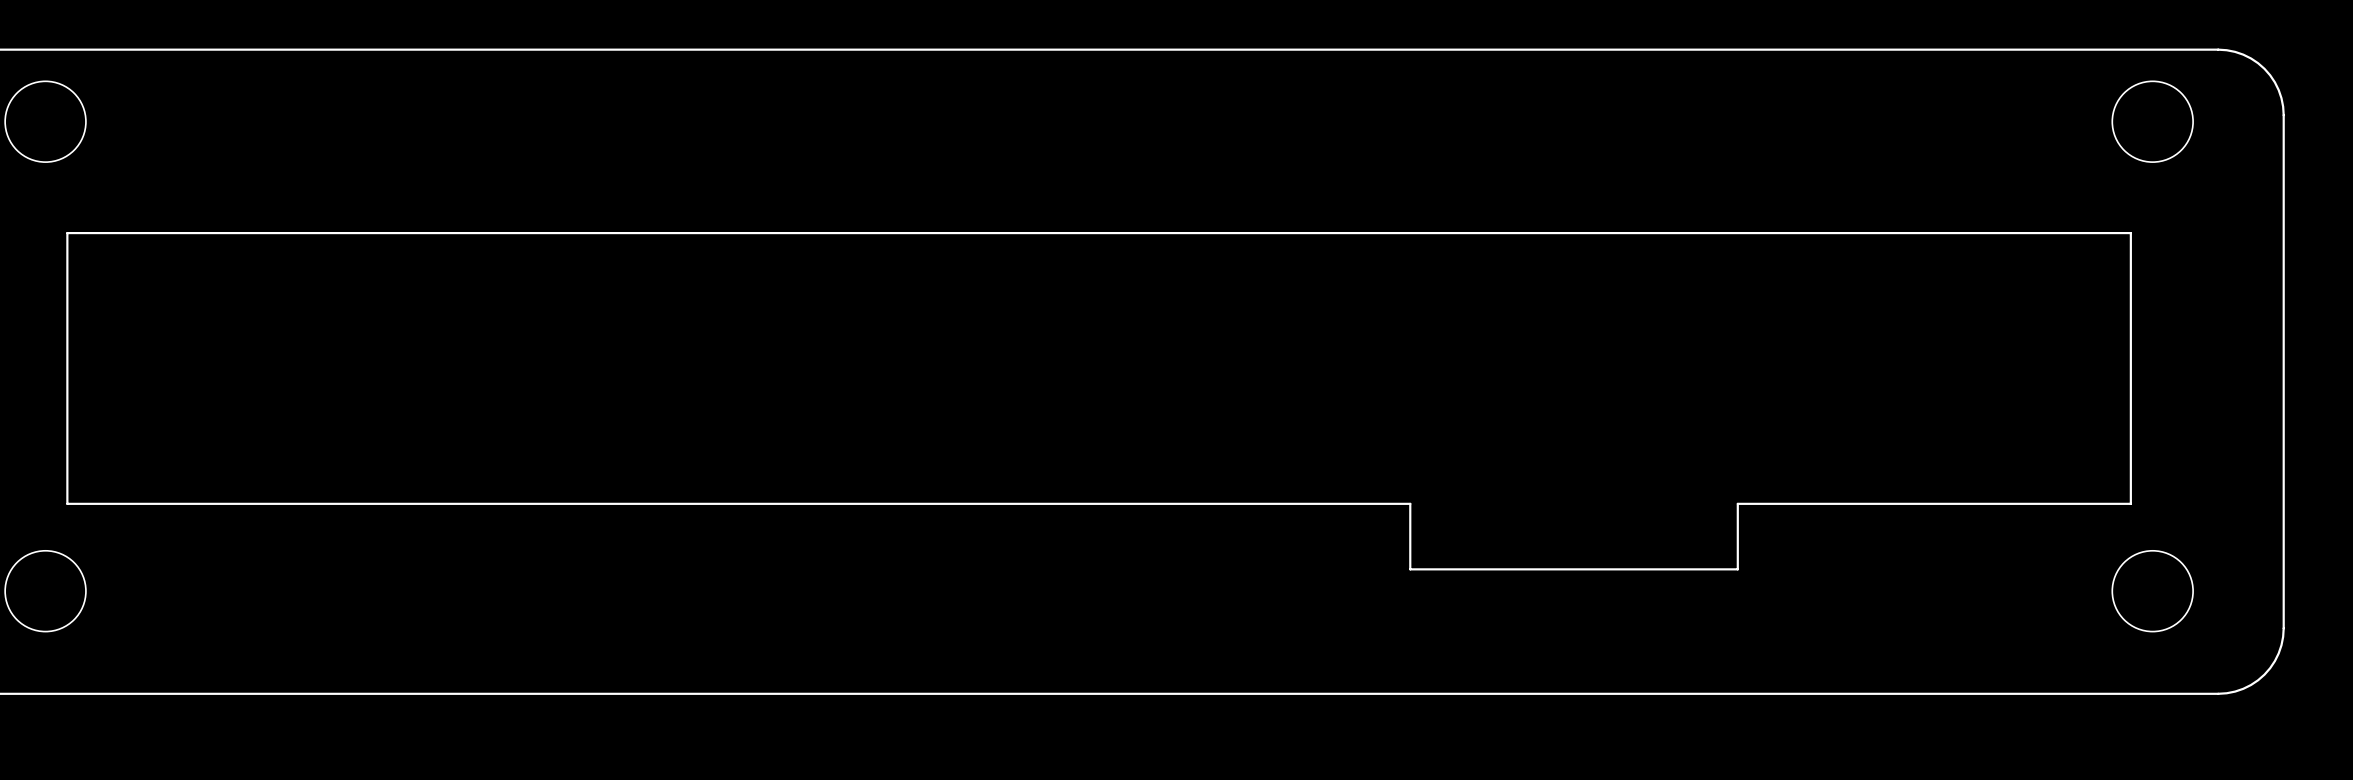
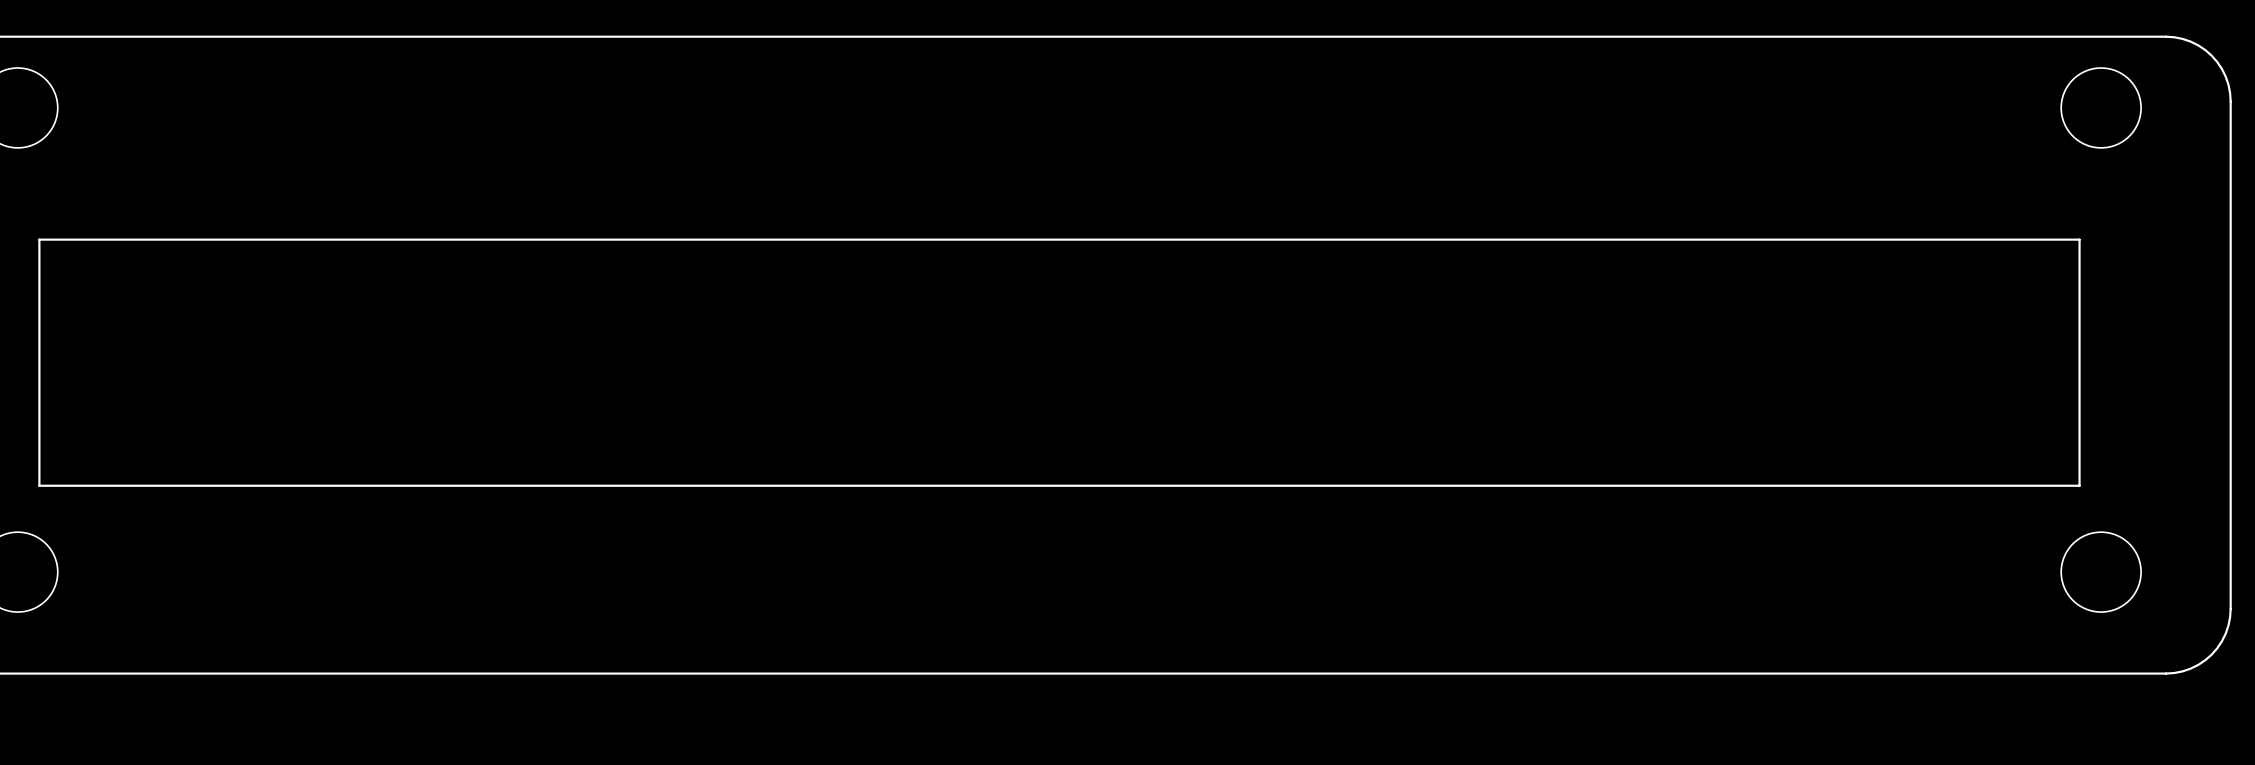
board edge: (67, 254) (67, 233) (2130, 233) (2130, 254) -> (39, 239) (2079, 239)
board edge: (1410, 503) (1410, 569) (1737, 569) (1737, 503) -> (1367, 485) (1690, 485)

